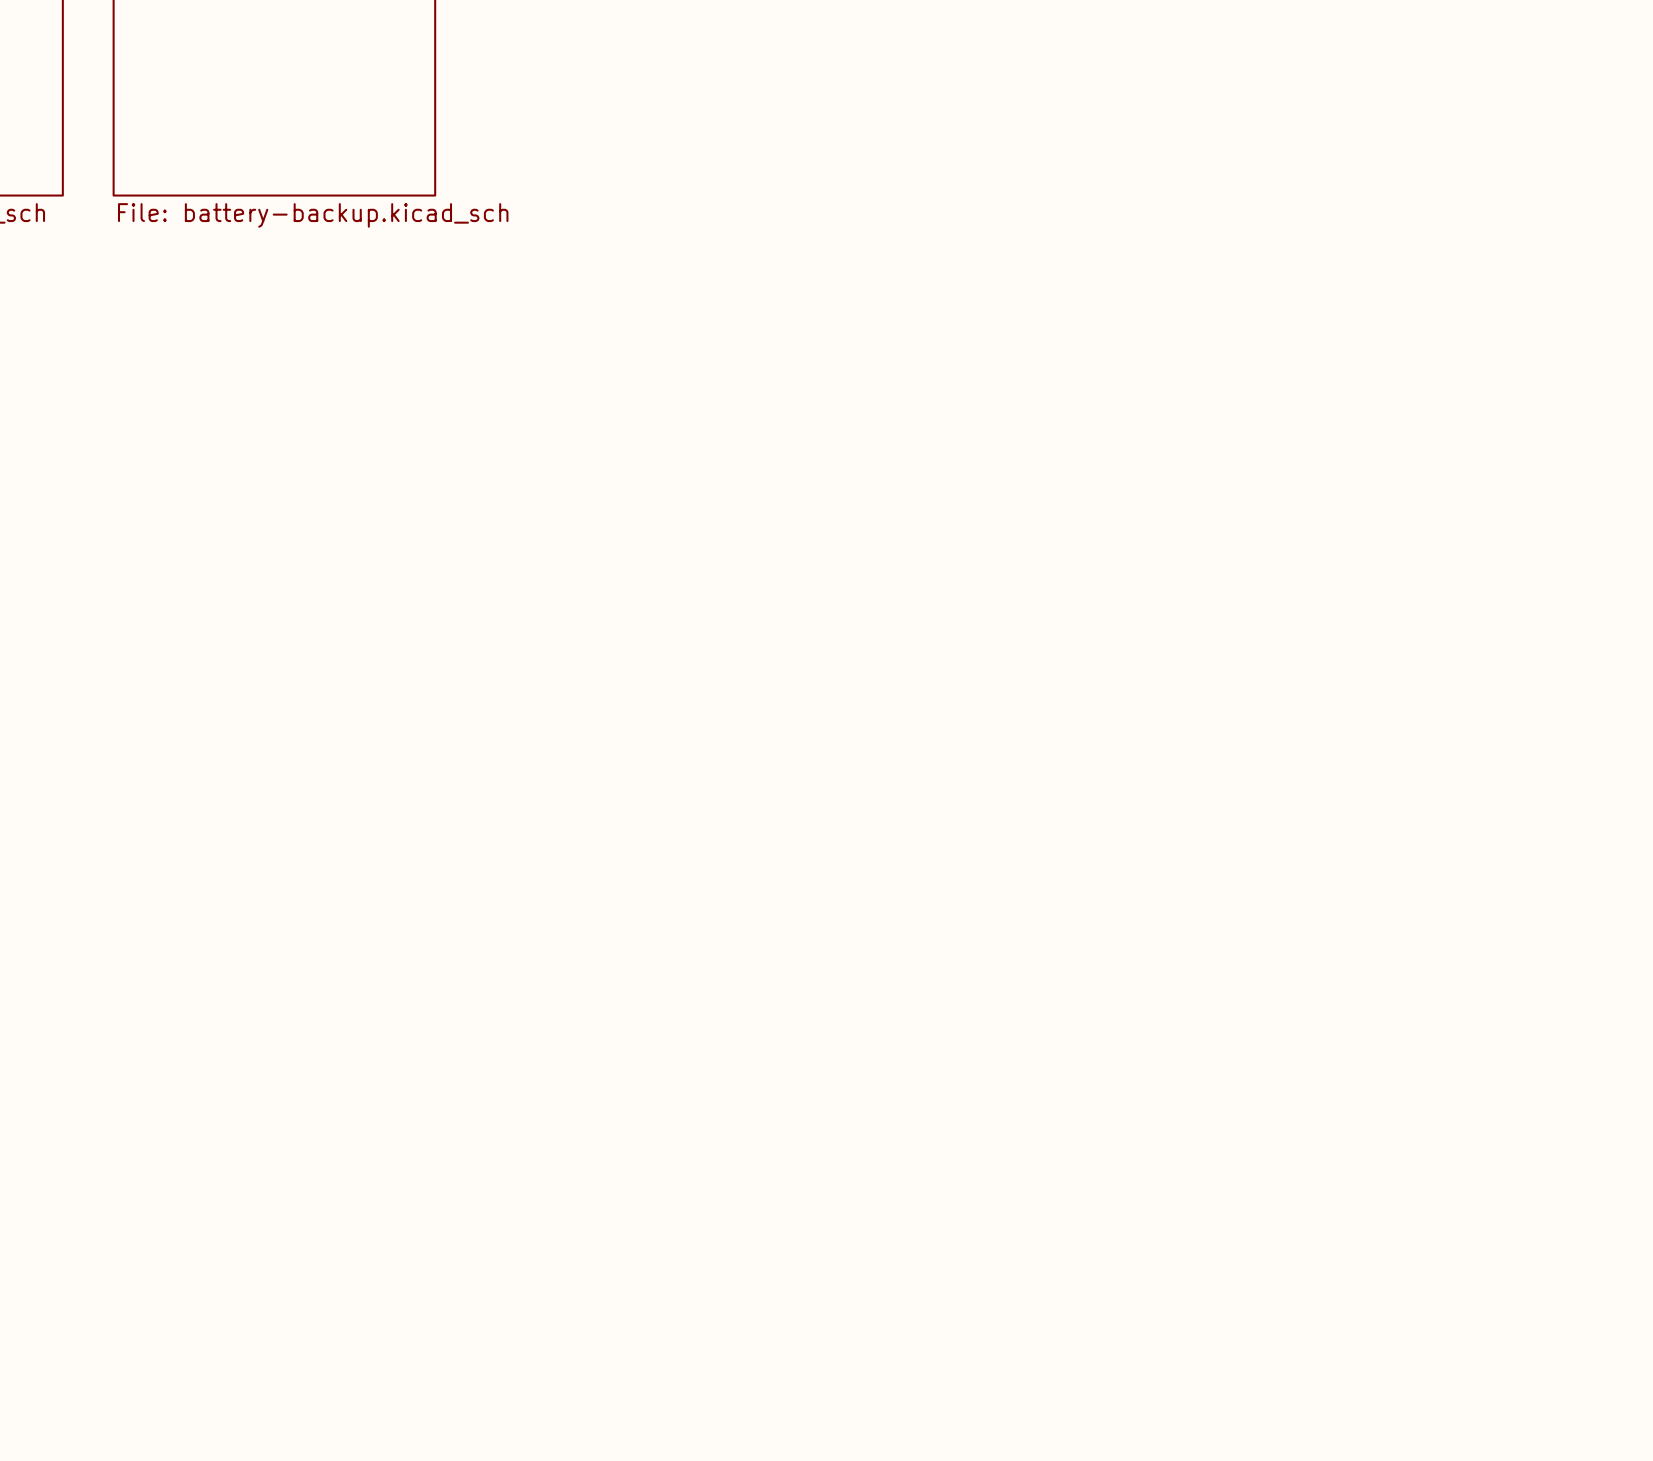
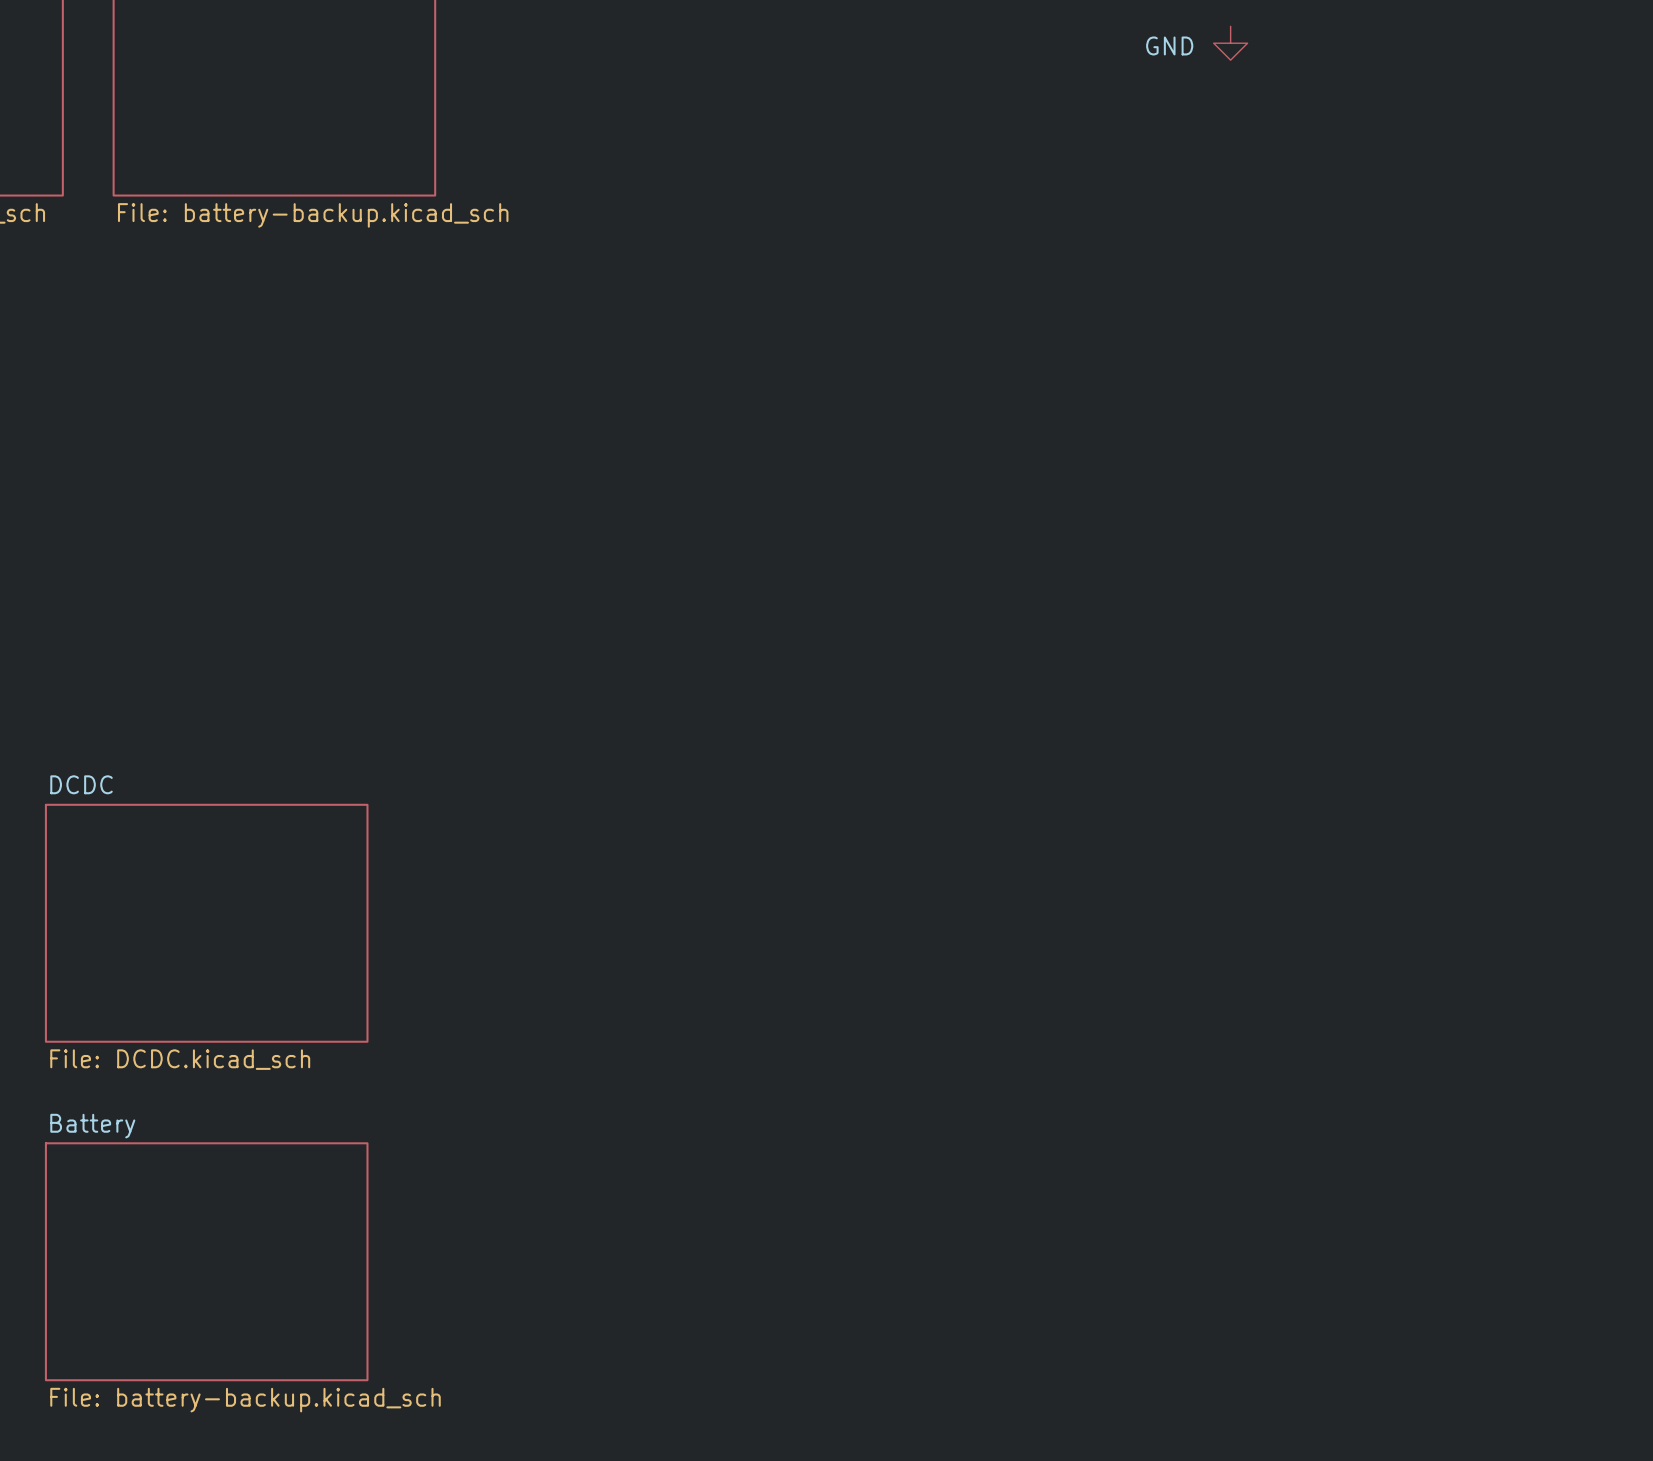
power symbol: none -> GND (1230, 43)
sheet DCDC: none -> File: DCDC.kicad_sch (206, 923)
sheet Battery: none -> File: battery-backup.kicad_sch (206, 1261)

